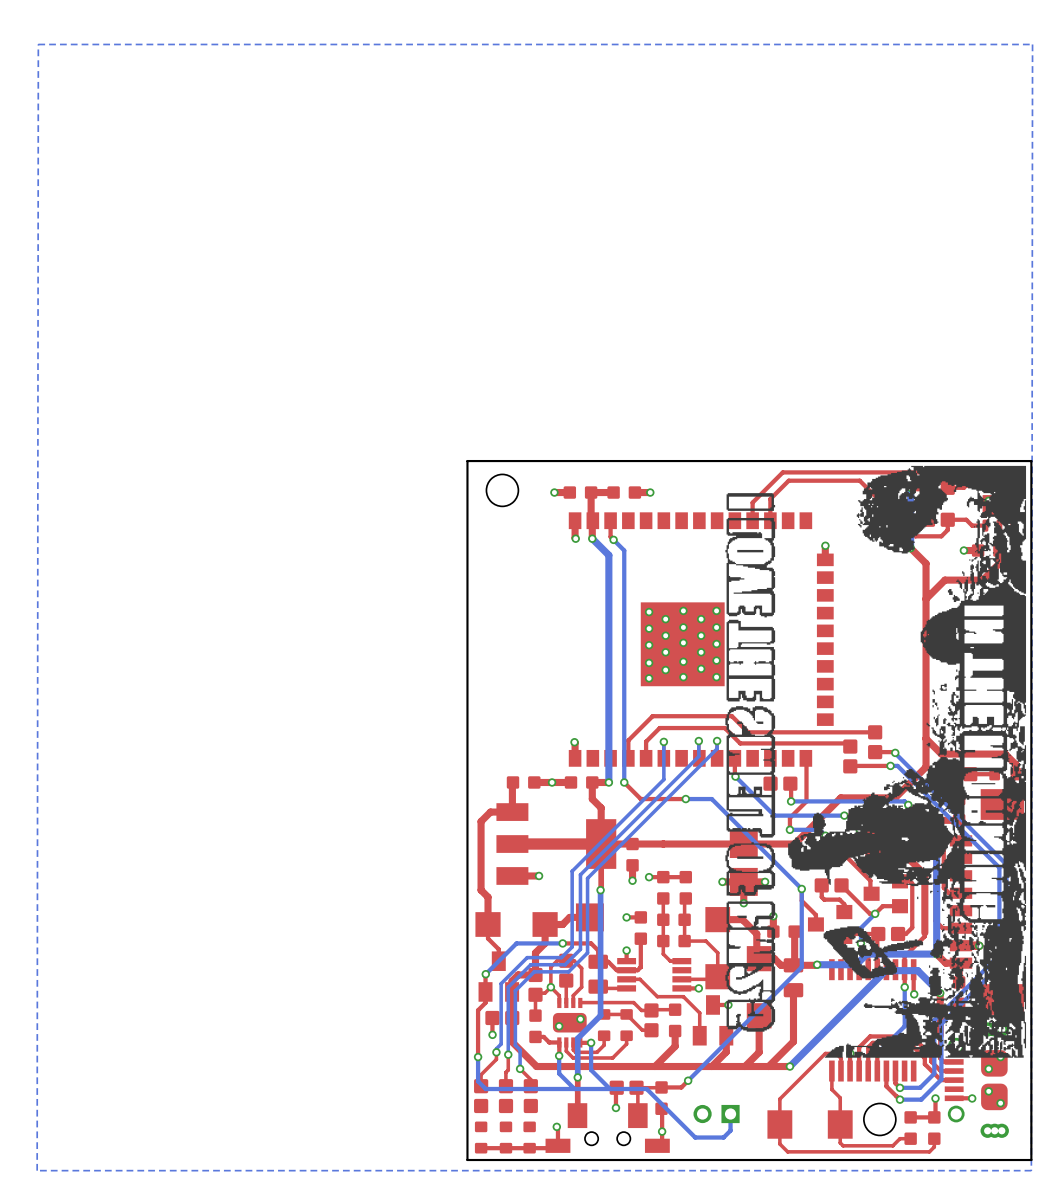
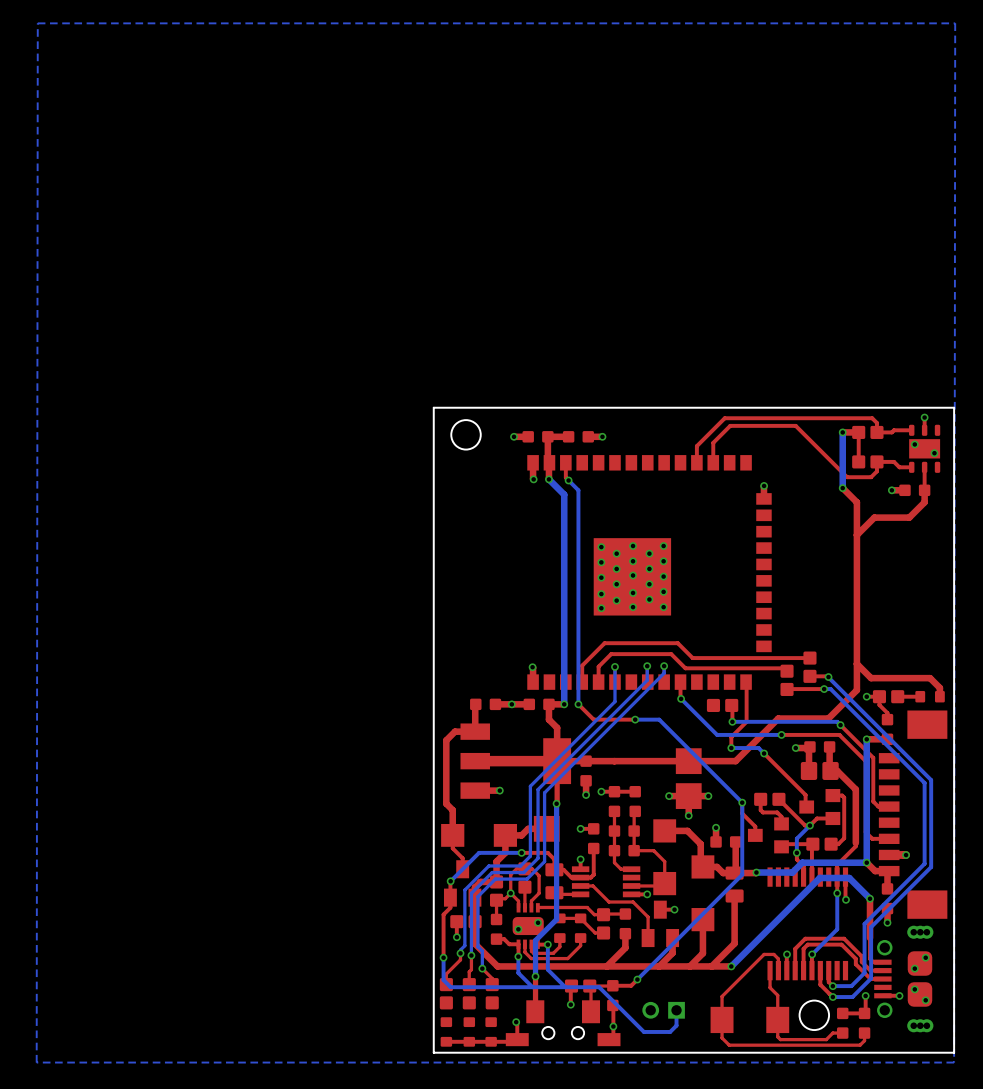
drawing: [725, 465, 1027, 1058] -> none

